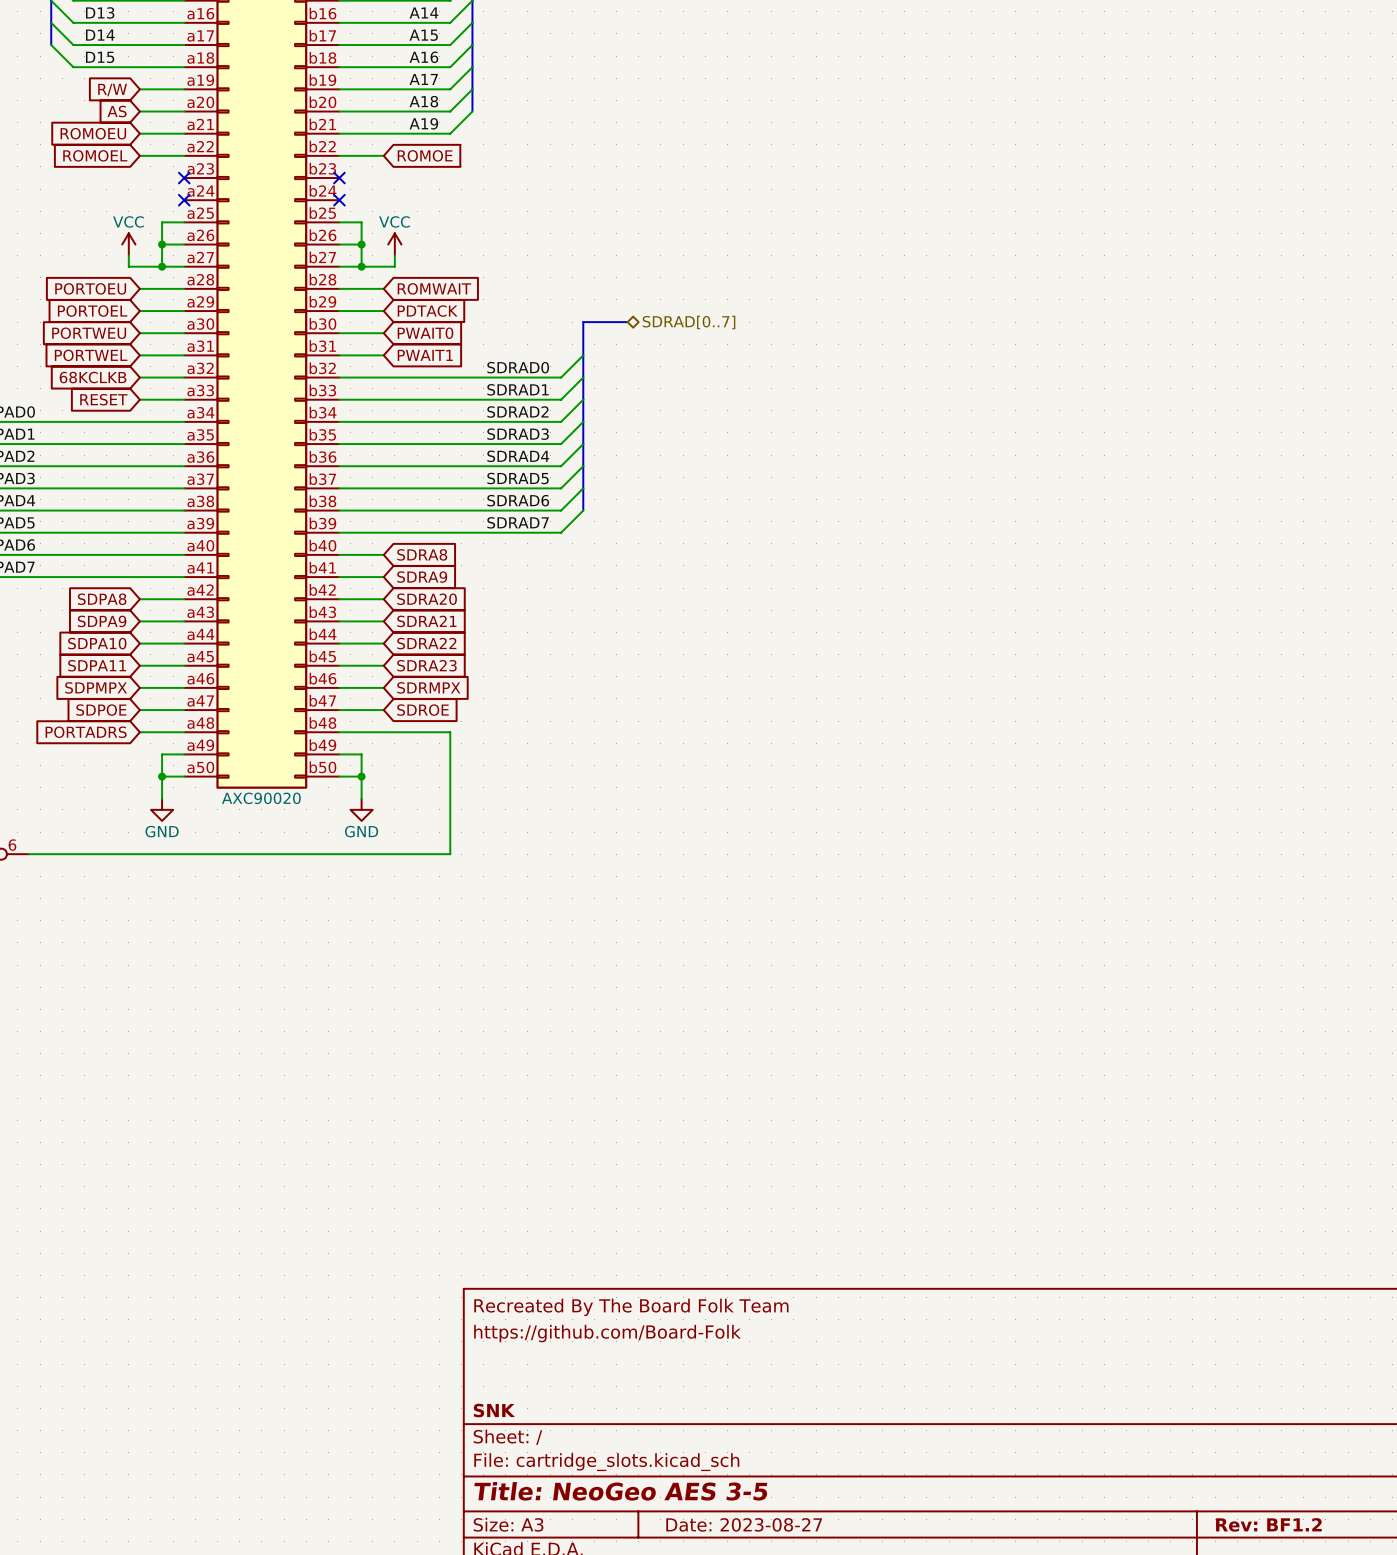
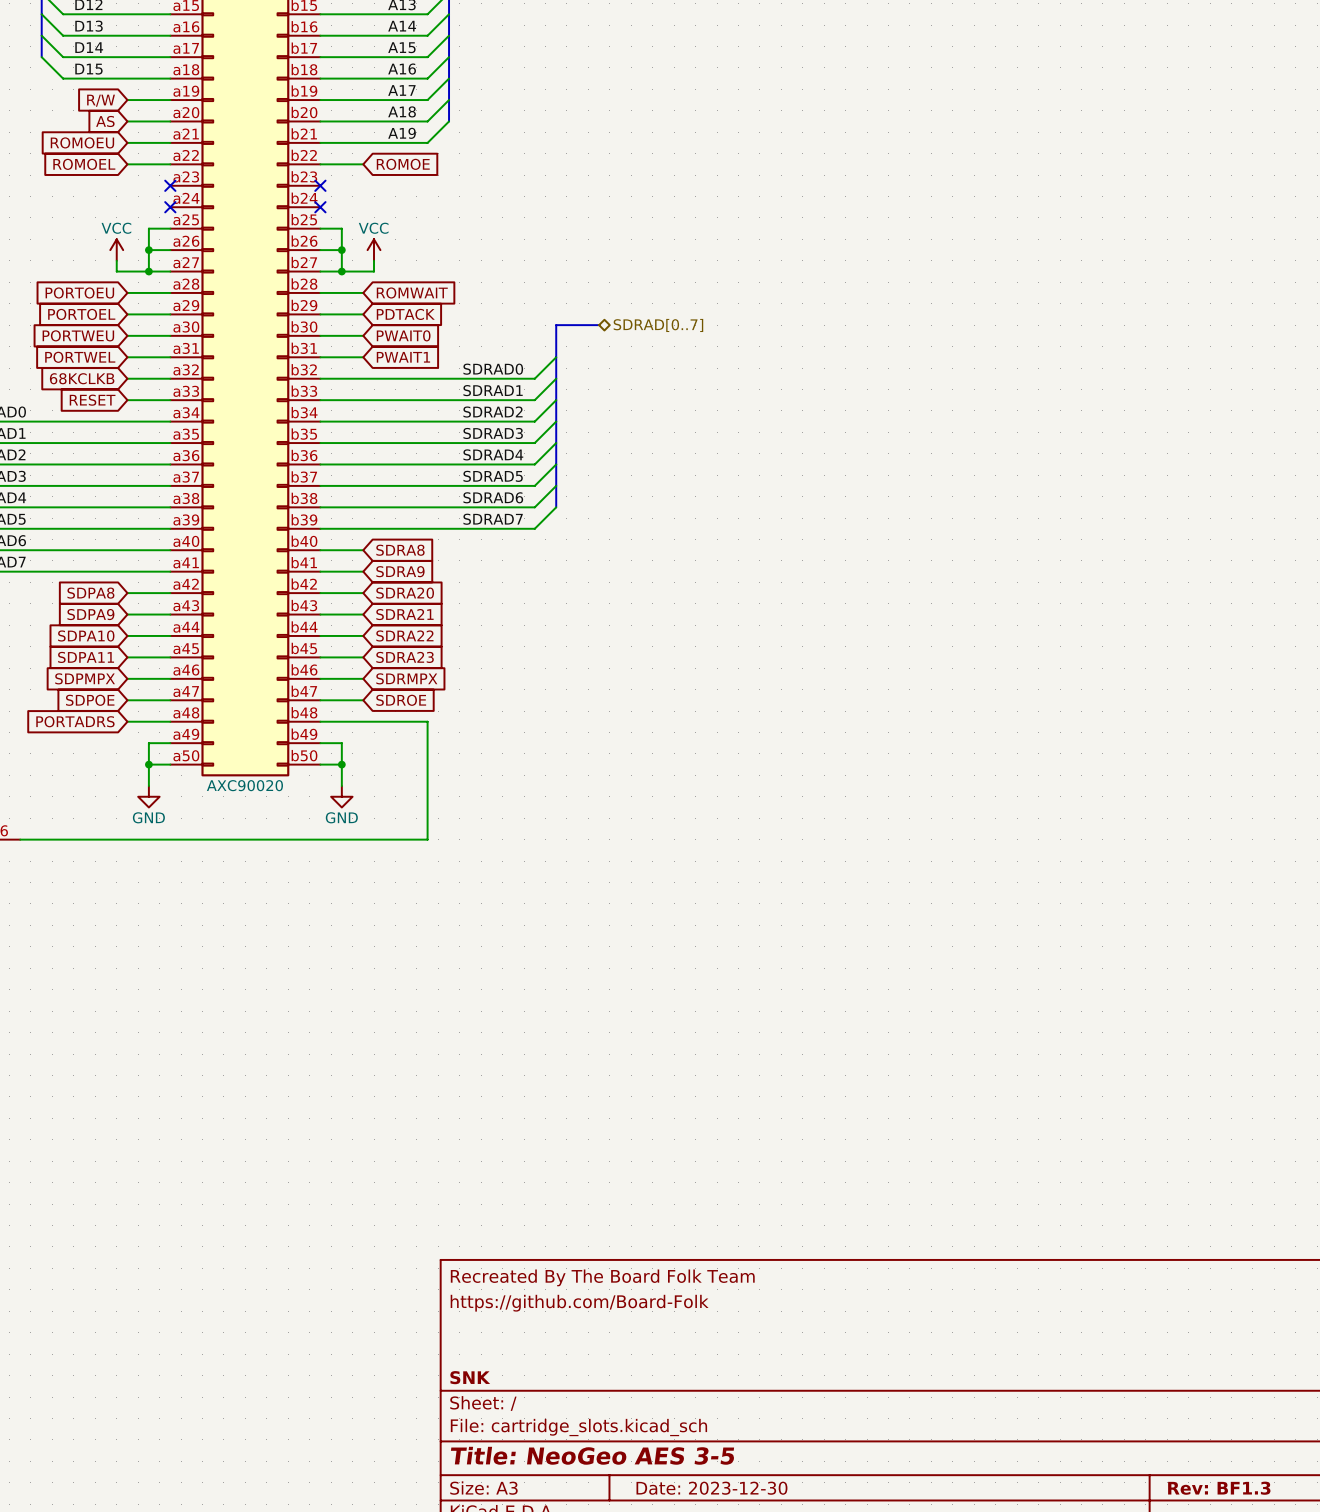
title block: Date: 2023-08-27 (744, 1524) -> Date: 2023-12-30 (711, 1488)
title block: Rev: BF1.2 (1268, 1524) -> Rev: BF1.3 (1219, 1488)

